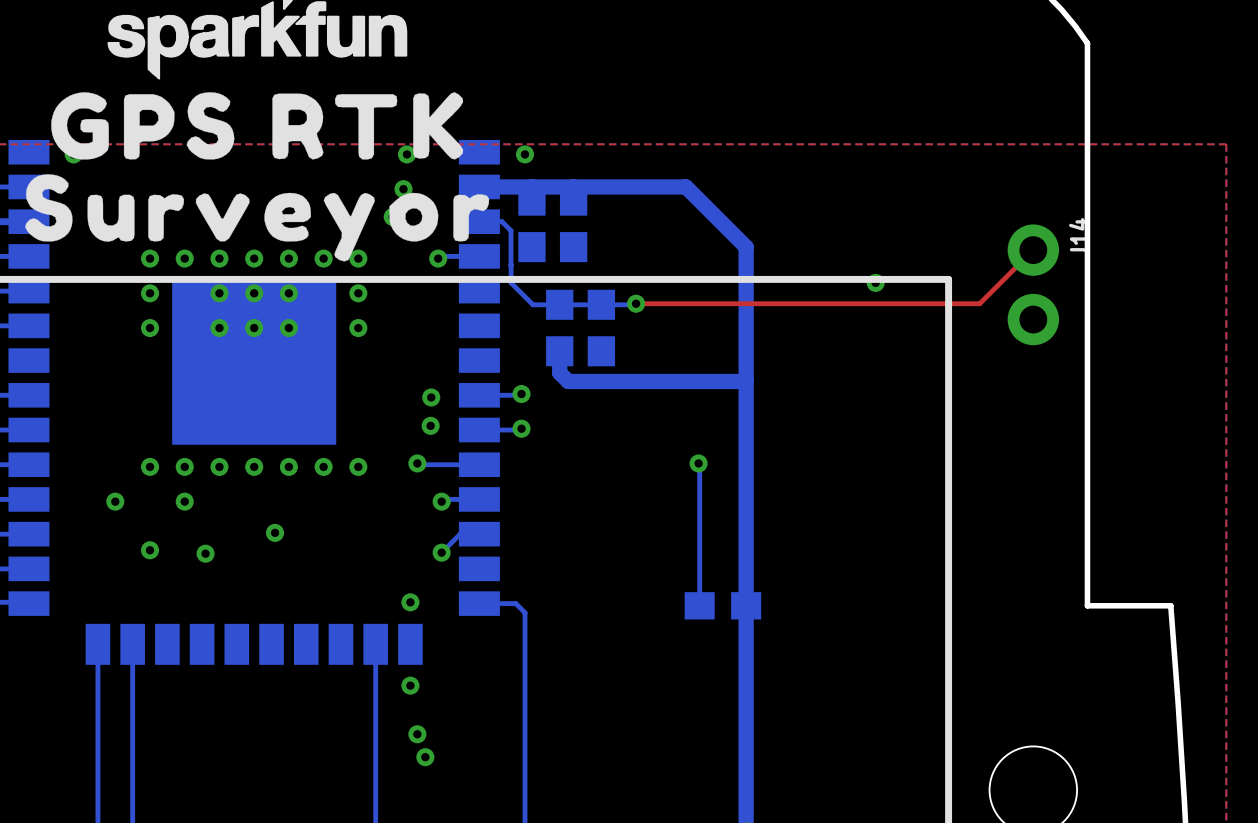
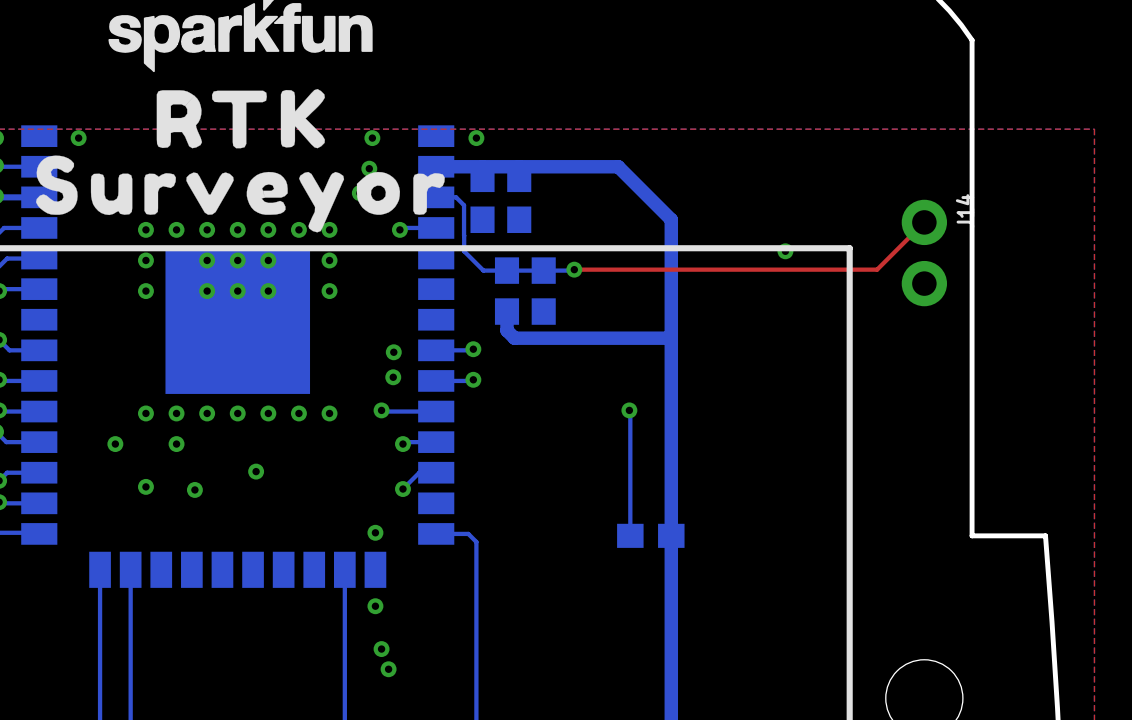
drawing shape: [51, 92, 464, 160] -> [156, 89, 325, 149]

